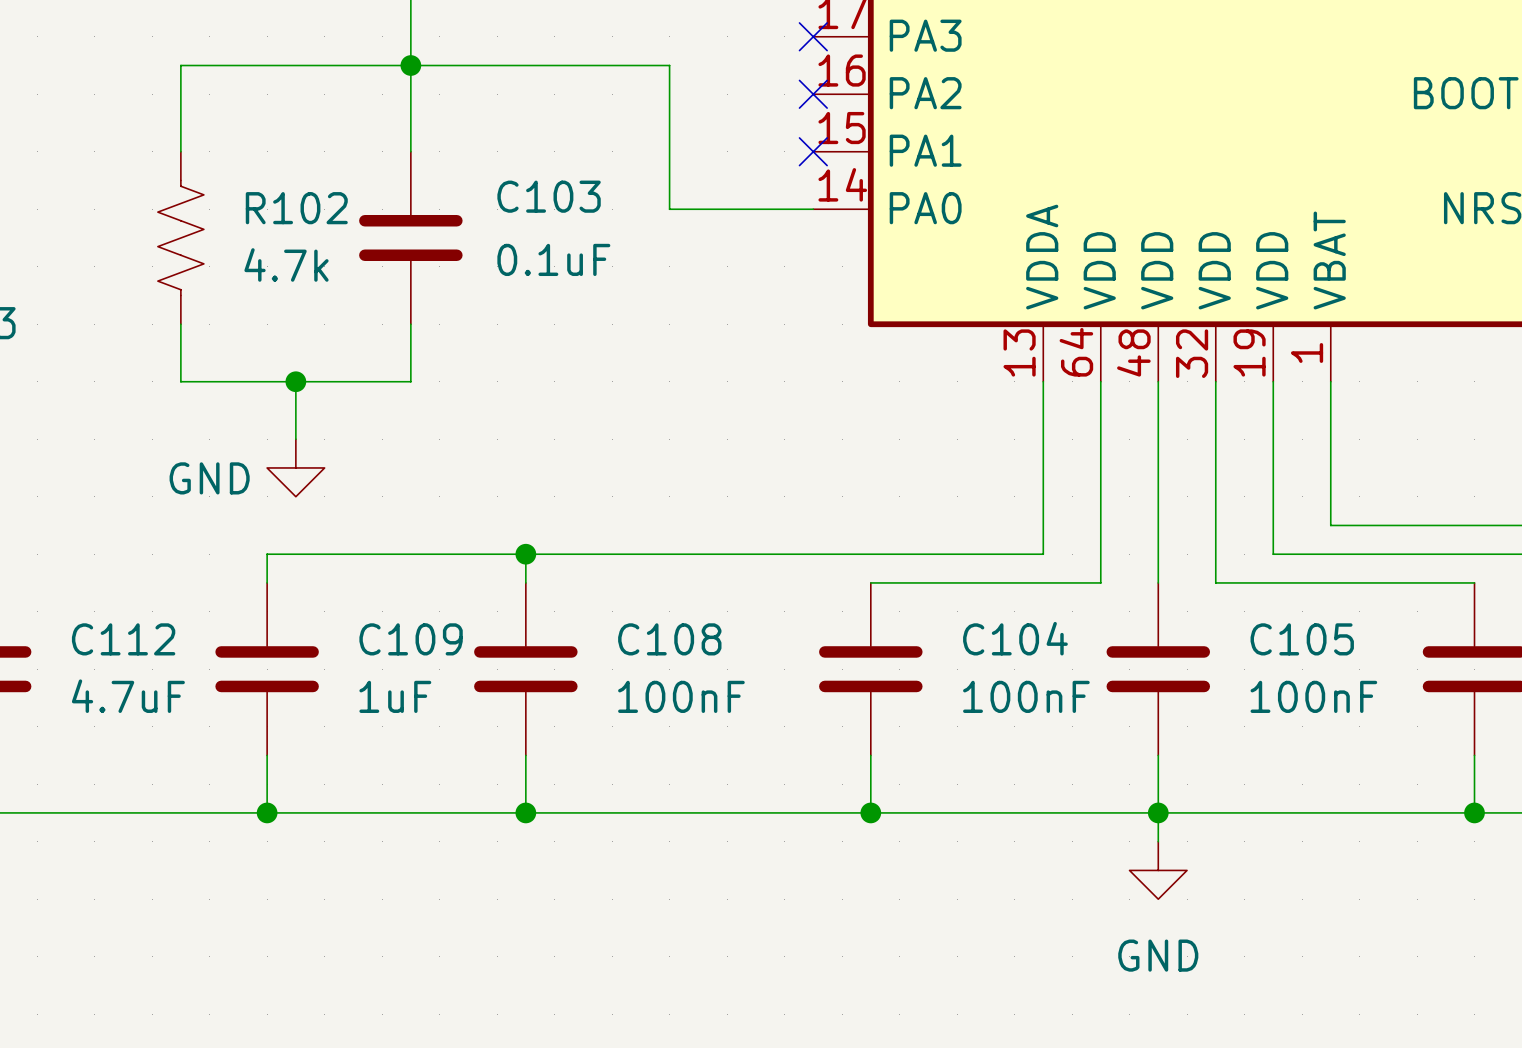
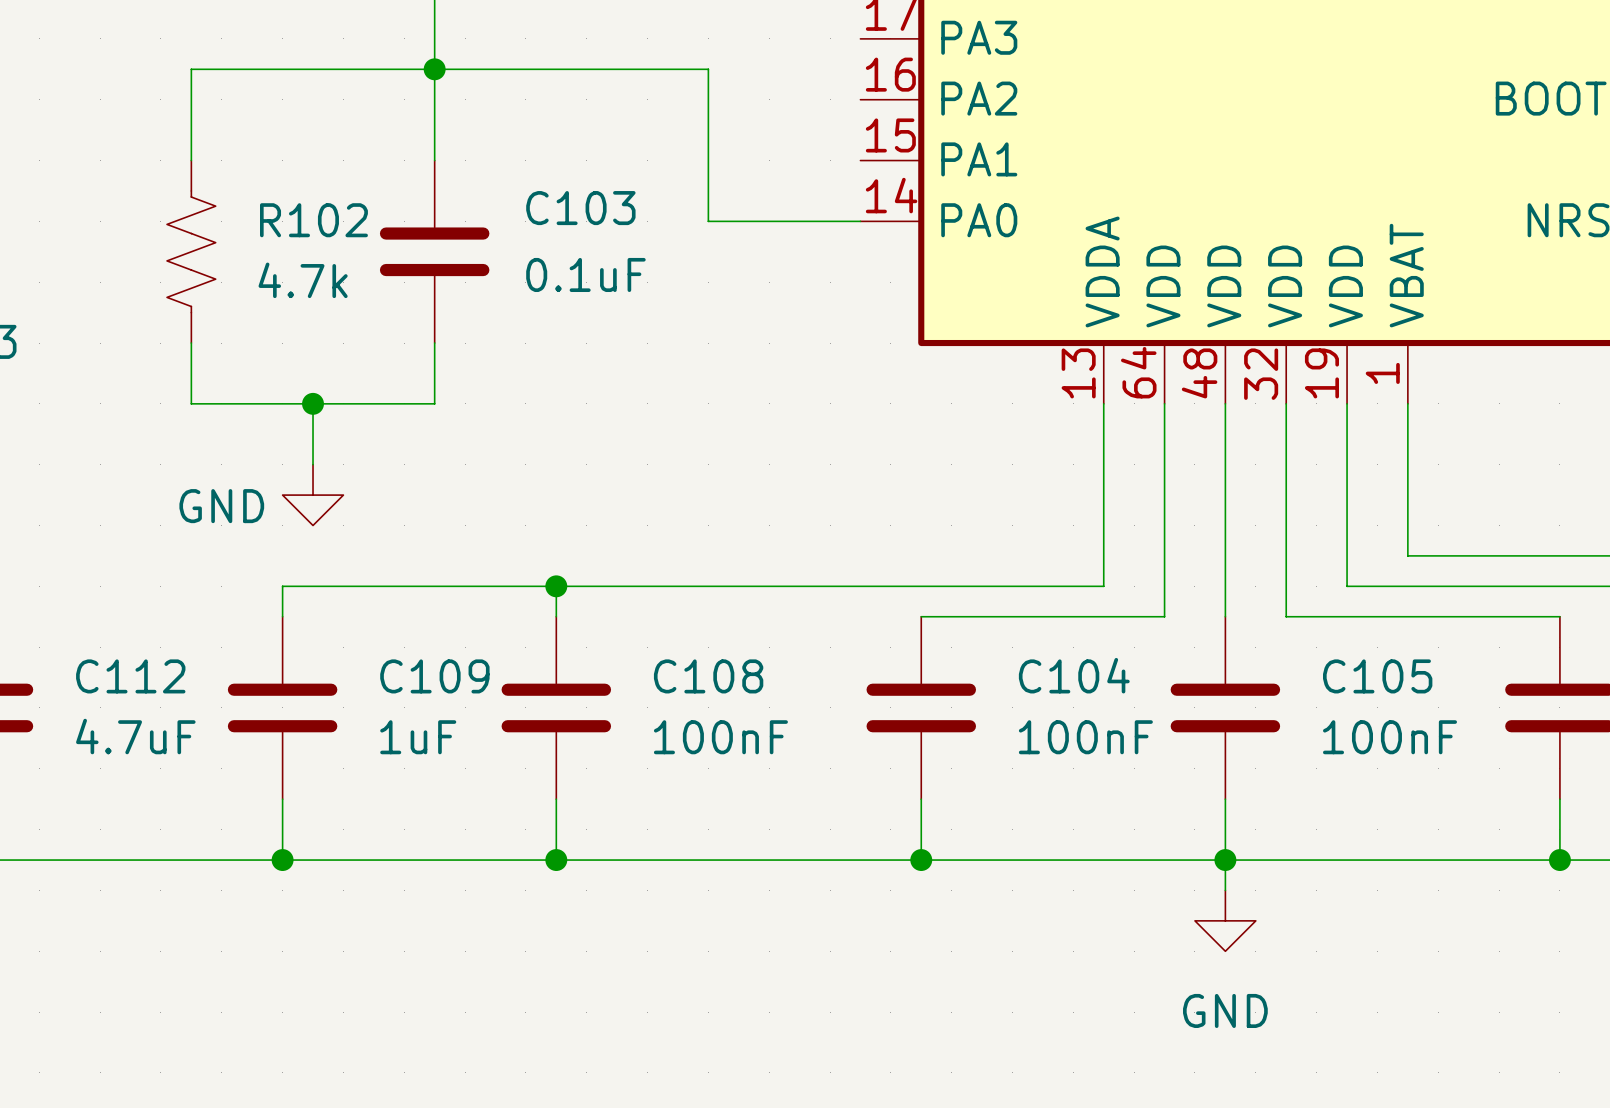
no-connect mark: (813, 36) -> none
no-connect mark: (813, 94) -> none
no-connect mark: (813, 151) -> none

